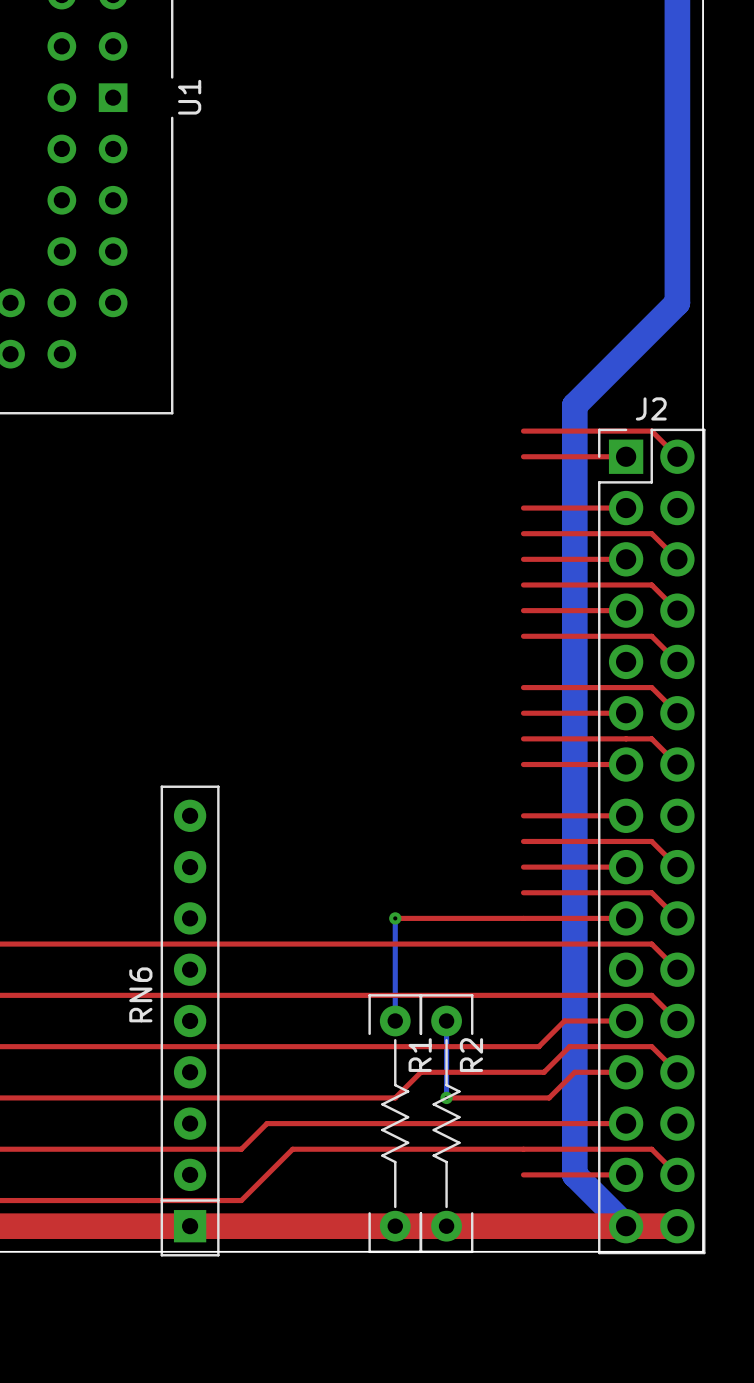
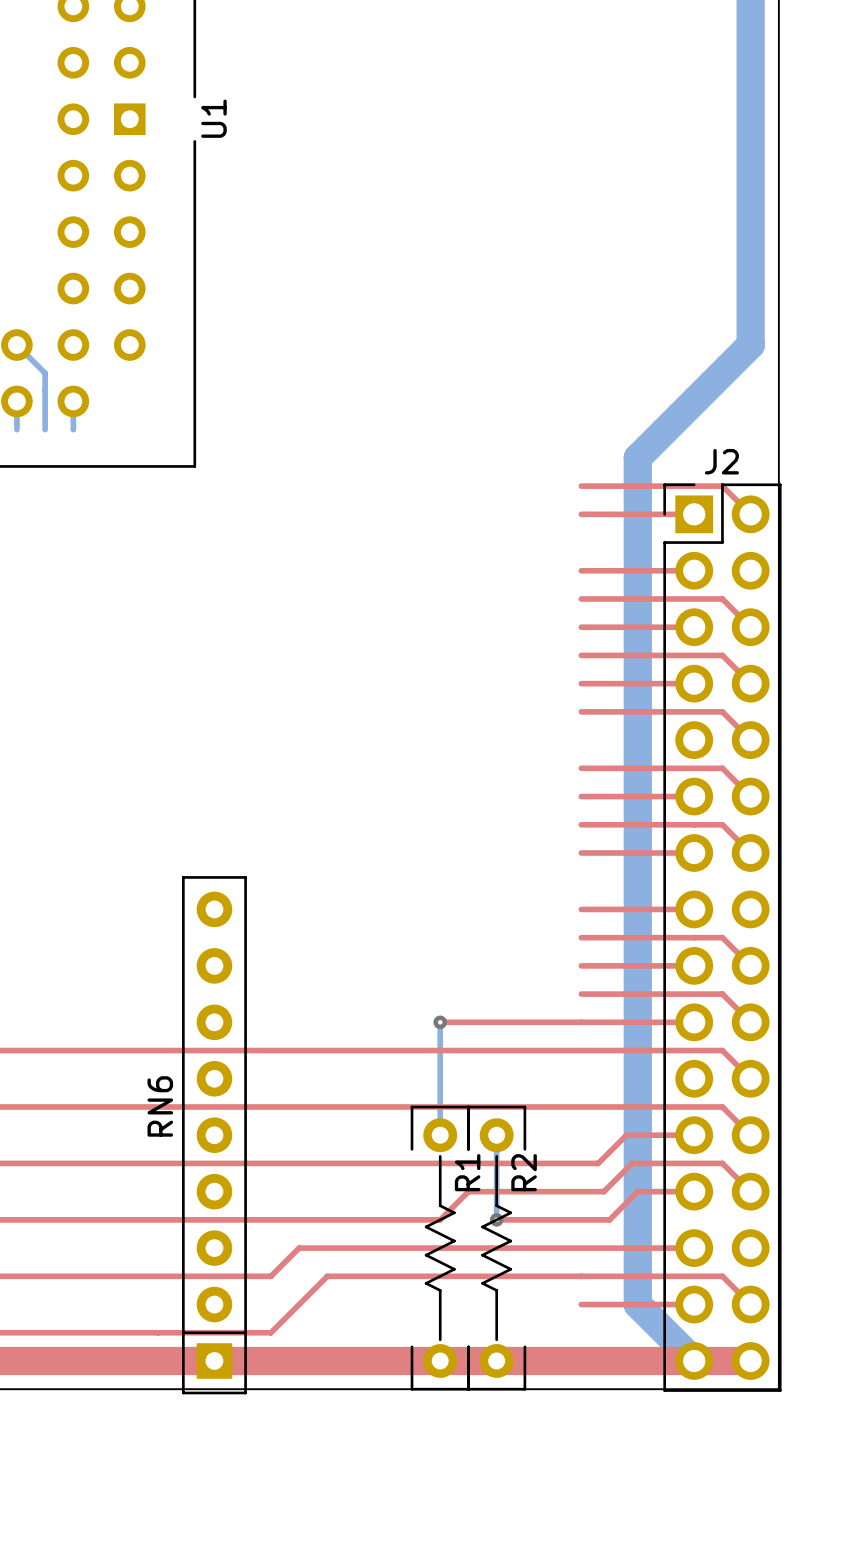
bottom track: none -> (16, 345) (45, 373) (45, 429)
bottom track: none -> (16, 401) (16, 429)
bottom track: none -> (73, 401) (73, 429)

